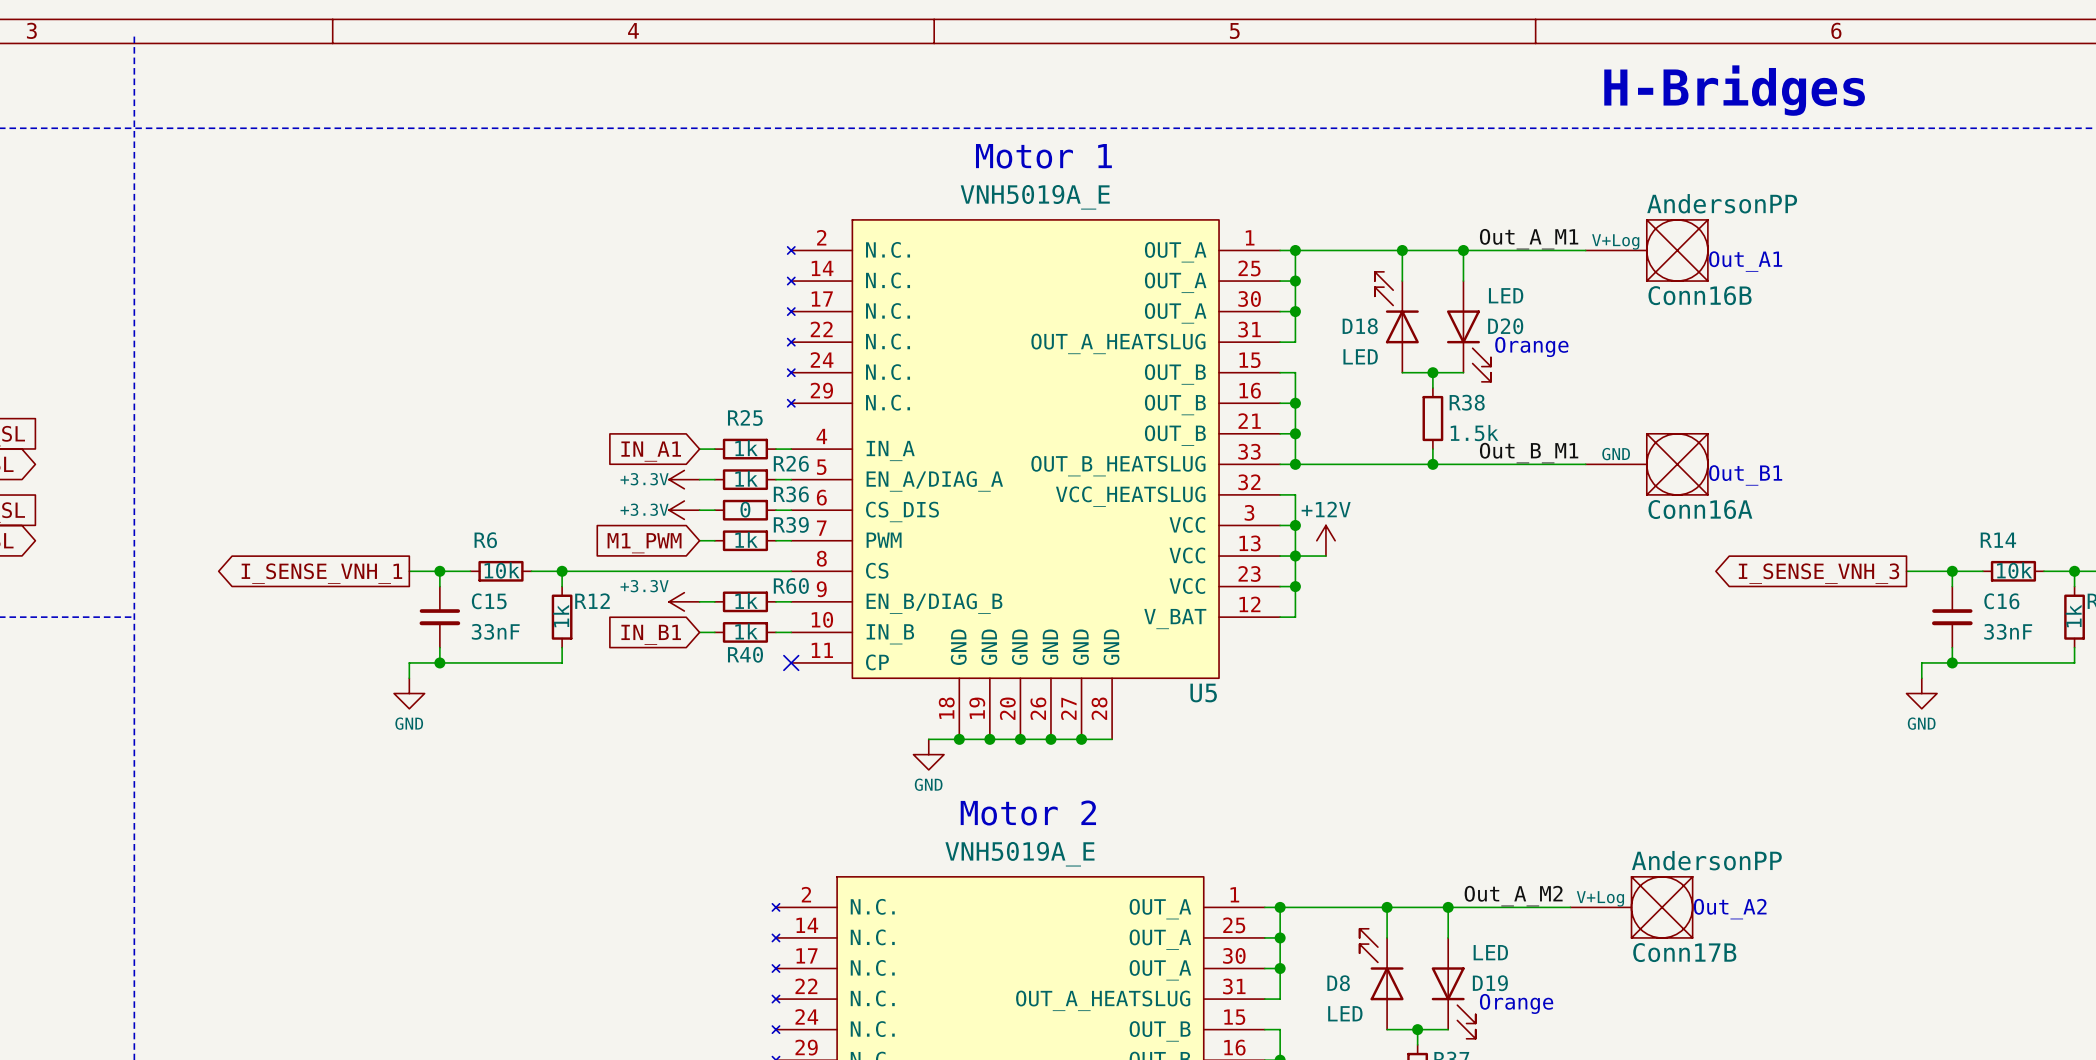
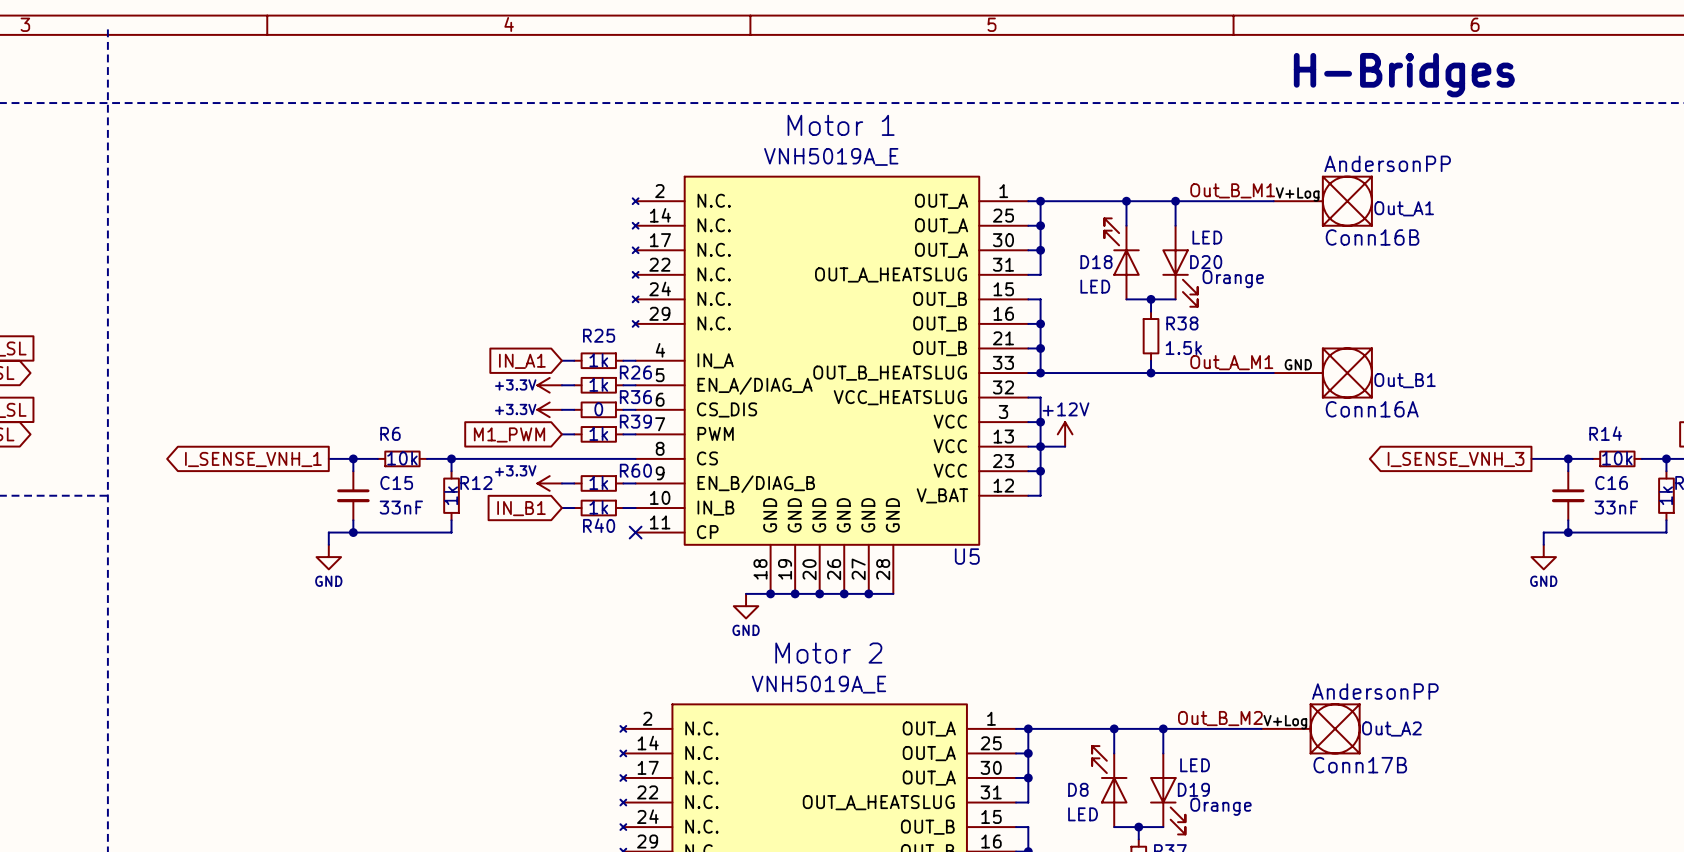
label: Out_A_M1 (1529, 239) -> Out_B_M1 (1232, 190)
label: Out_B_M1 (1529, 453) -> Out_A_M1 (1231, 362)
label: Out_A_M2 (1513, 896) -> Out_B_M2 (1220, 718)

